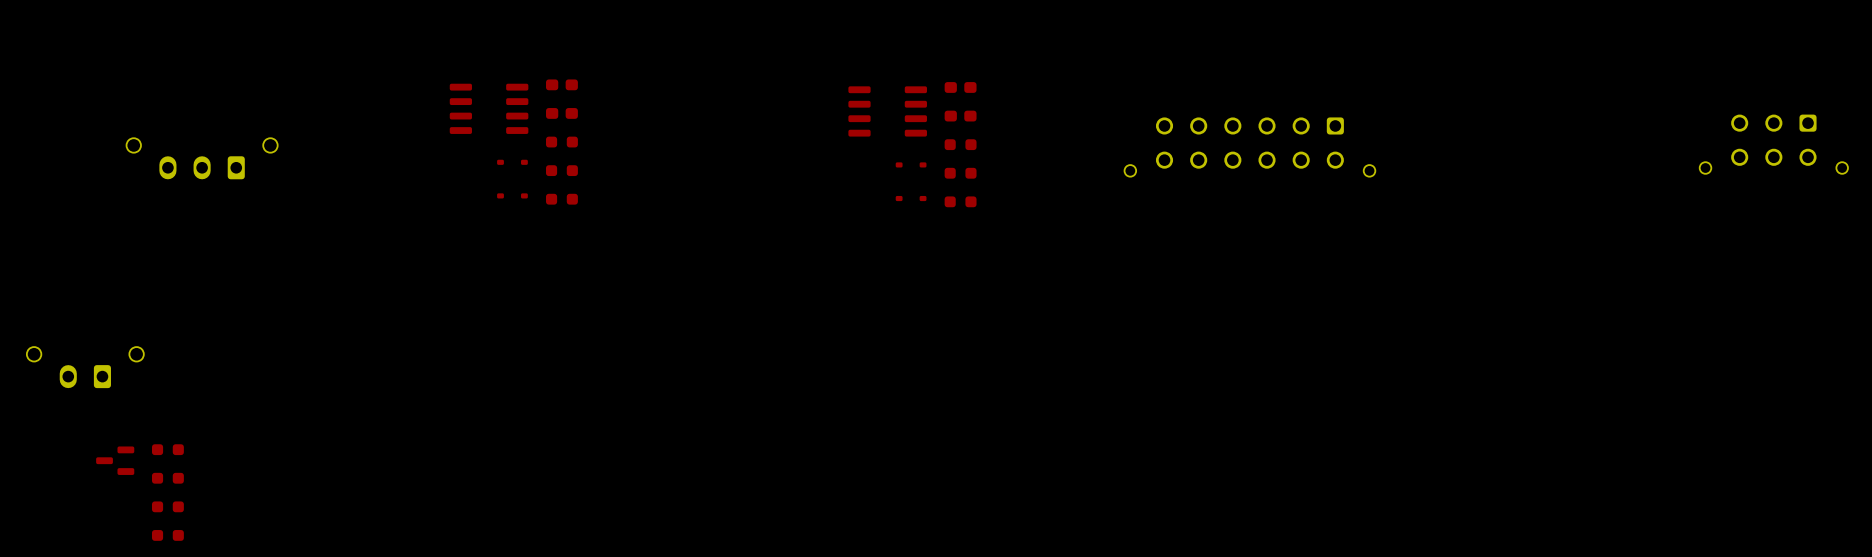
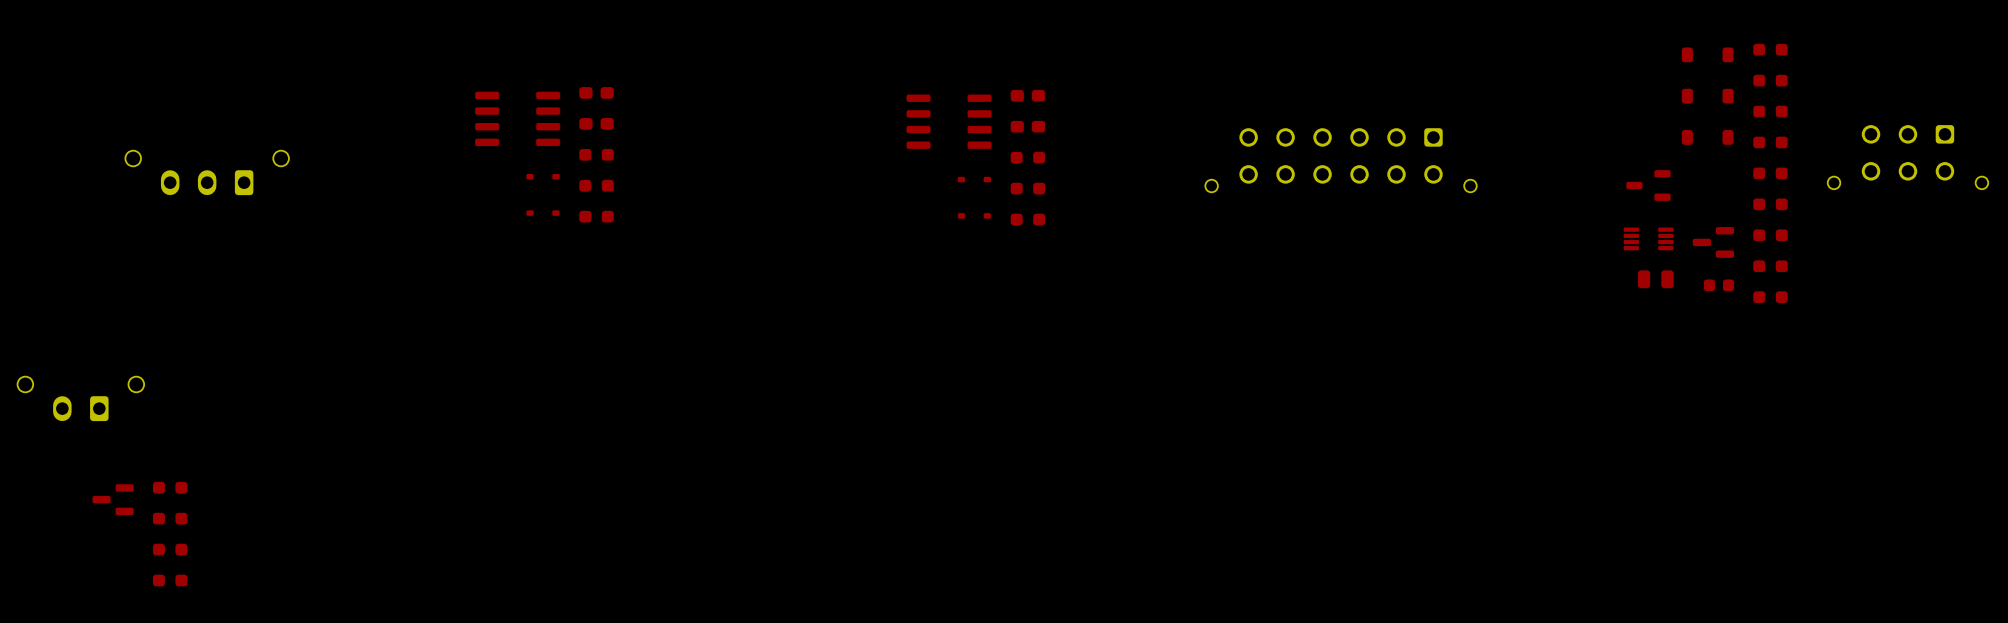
part: none -> (1770, 49)
part: none -> (1707, 54)
part: none -> (1770, 80)
part: none -> (1707, 96)
part: none -> (1770, 111)
part: none -> (1707, 137)
part: none -> (1770, 142)
part: none -> (1770, 173)
part: none -> (1648, 185)
part: none -> (1770, 204)
part: none -> (1770, 235)
part: none -> (1648, 238)
part: none -> (1713, 242)
part: none -> (1770, 266)
part: none -> (1655, 279)
part: none -> (1718, 285)
part: none -> (1770, 297)

